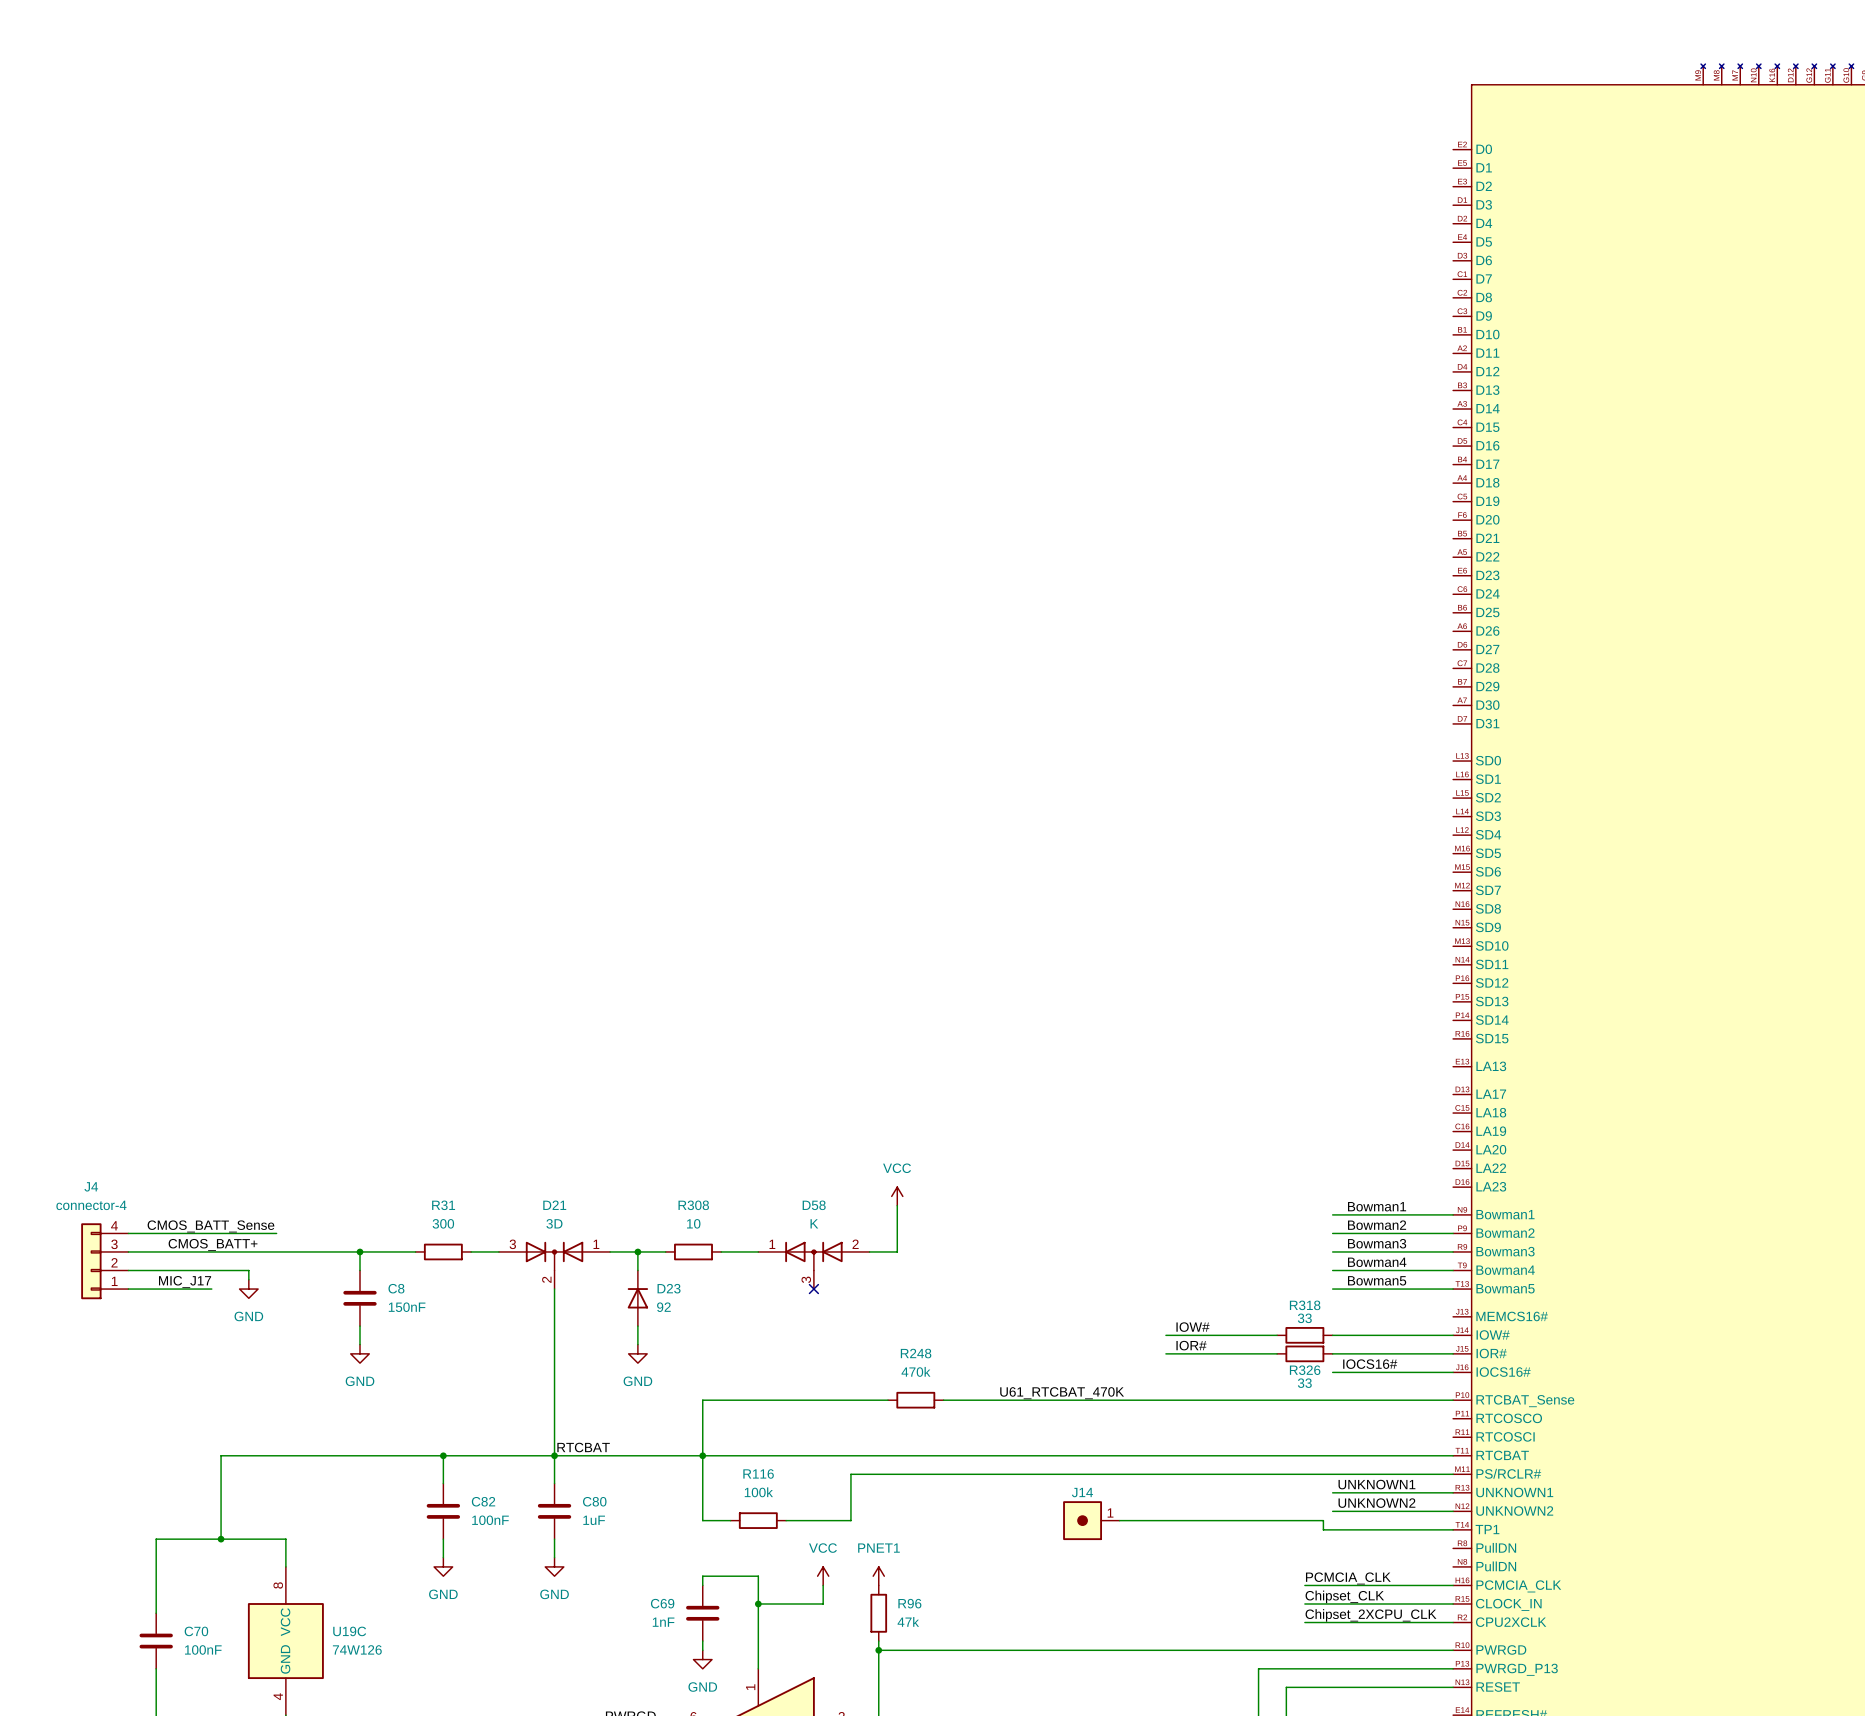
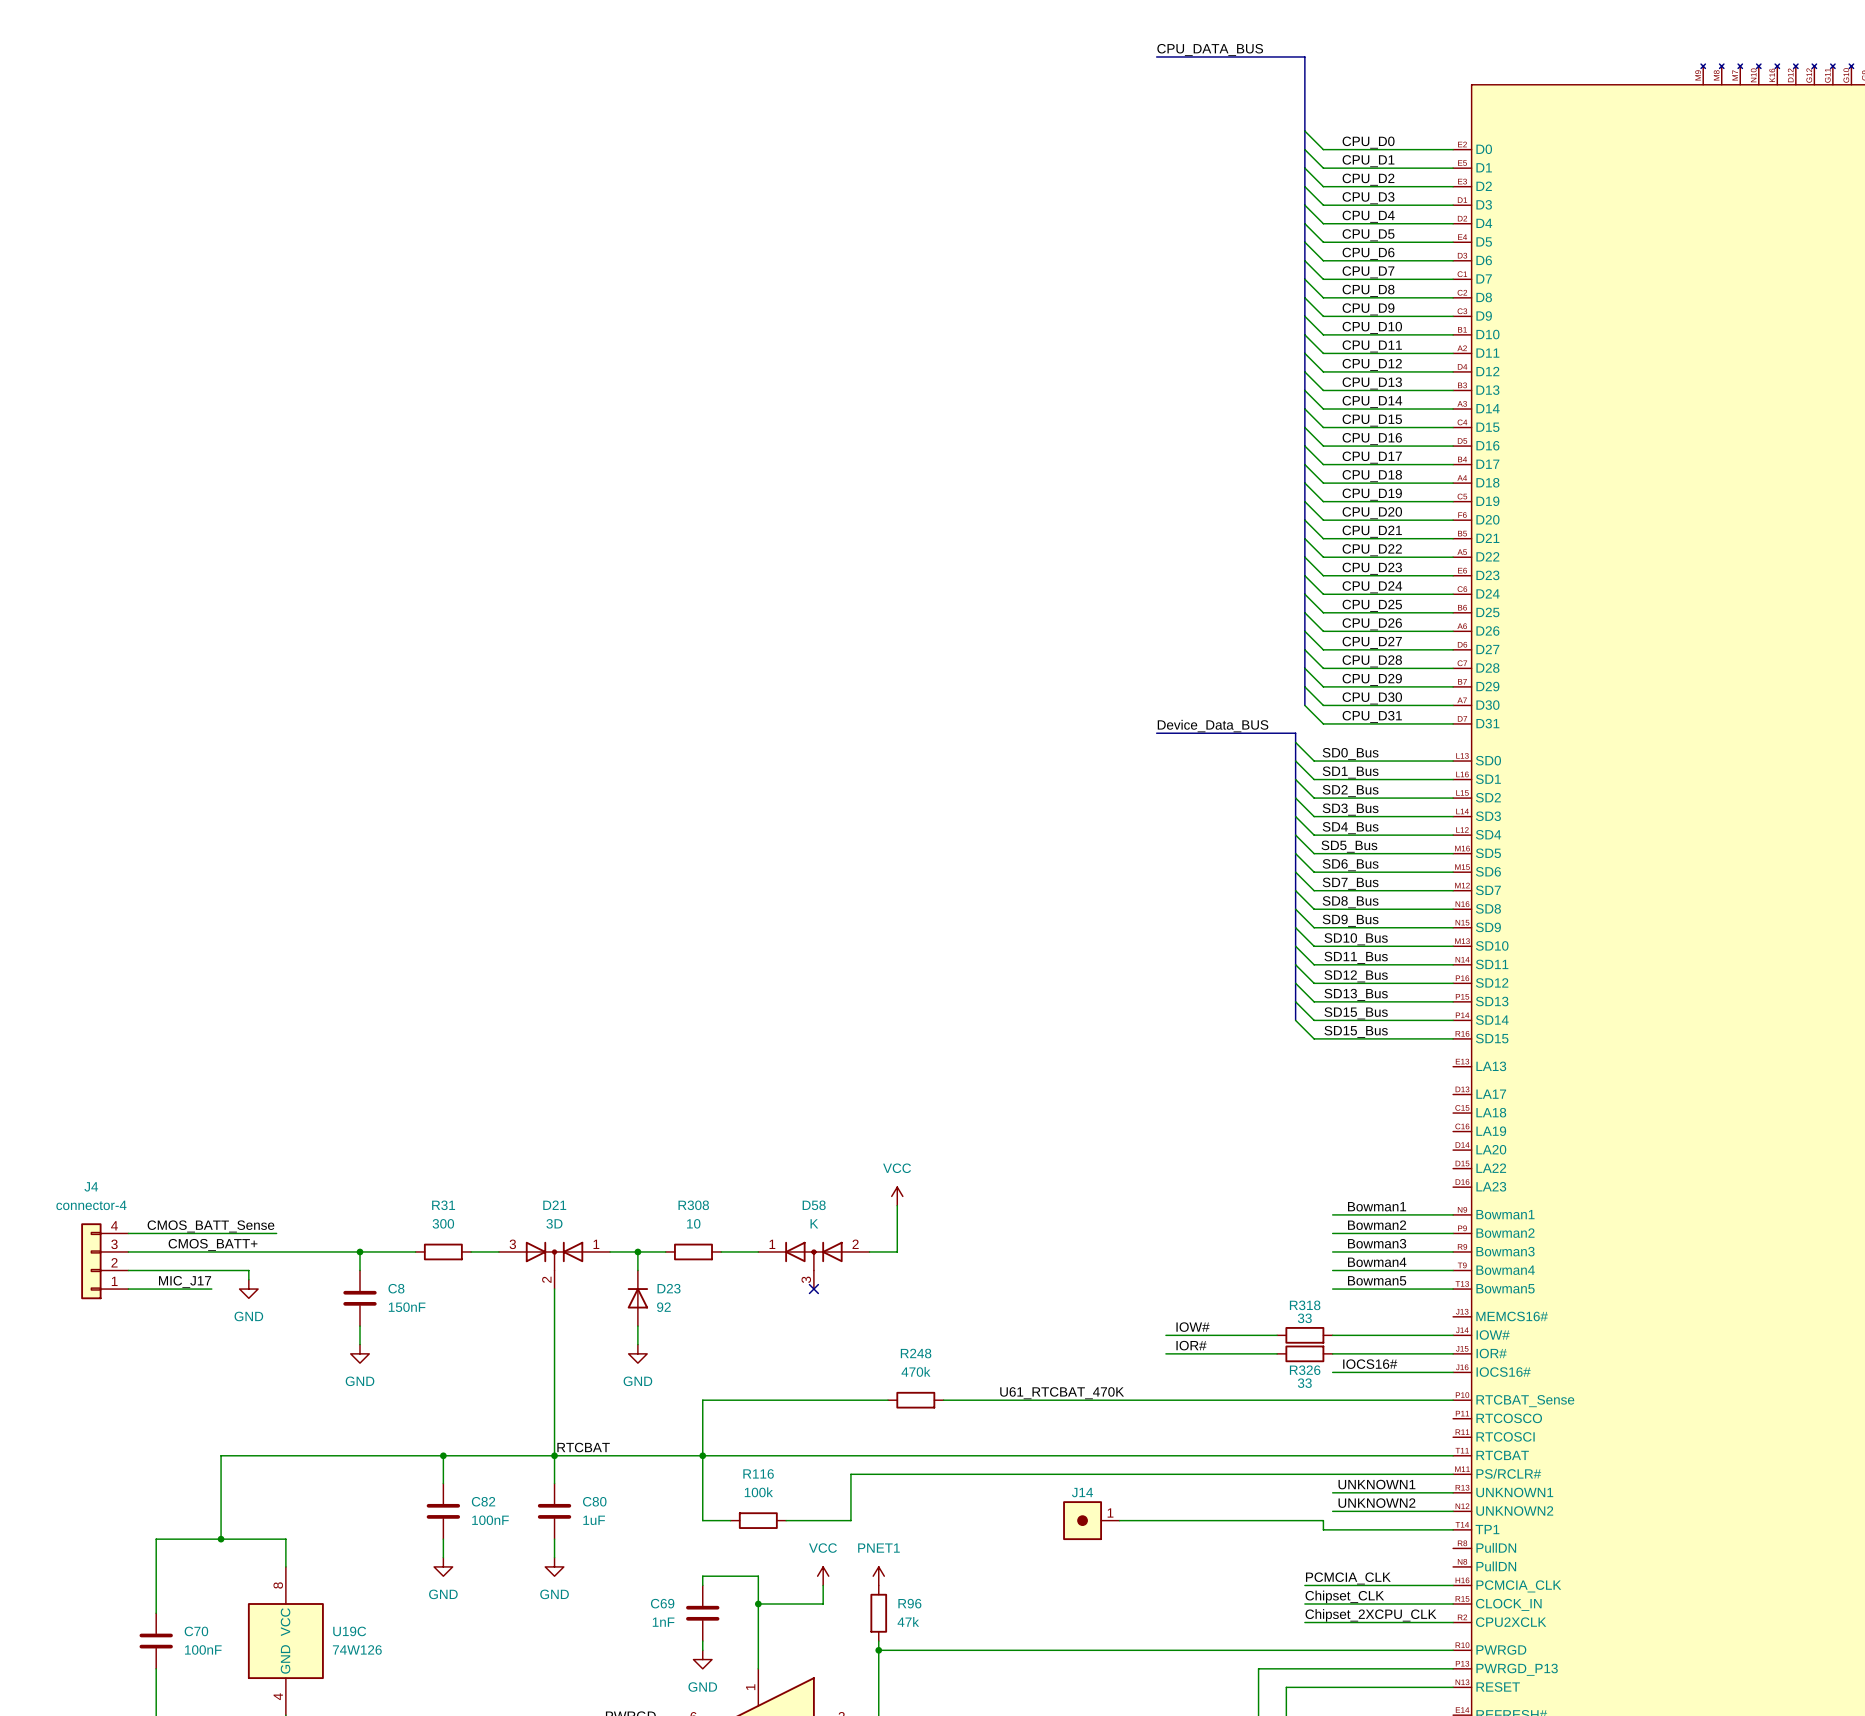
label: none -> CPU_DATA_BUS (1210, 49)
bus: none -> (1156, 56) (1304, 56) (1304, 705)
wire: none -> (1304, 131) (1323, 149) (1453, 149)
label: none -> CPU_D0 (1368, 142)
wire: none -> (1304, 149) (1323, 168) (1453, 168)
label: none -> CPU_D1 (1368, 161)
wire: none -> (1304, 168) (1323, 186) (1453, 186)
label: none -> CPU_D2 (1368, 179)
wire: none -> (1304, 186) (1323, 205) (1453, 205)
label: none -> CPU_D3 (1368, 198)
wire: none -> (1304, 205) (1323, 223) (1453, 223)
label: none -> CPU_D4 (1368, 216)
wire: none -> (1304, 223) (1323, 242) (1453, 242)
label: none -> CPU_D5 (1368, 235)
wire: none -> (1304, 242) (1323, 260) (1453, 260)
label: none -> CPU_D6 (1368, 253)
wire: none -> (1304, 260) (1323, 279) (1453, 279)
label: none -> CPU_D7 (1368, 272)
wire: none -> (1304, 279) (1323, 297) (1453, 297)
label: none -> CPU_D8 (1368, 290)
wire: none -> (1304, 297) (1323, 316) (1453, 316)
label: none -> CPU_D9 (1368, 309)
wire: none -> (1304, 316) (1323, 334) (1453, 334)
label: none -> CPU_D10 (1372, 327)
wire: none -> (1304, 334) (1323, 353) (1453, 353)
label: none -> CPU_D11 (1372, 346)
wire: none -> (1304, 353) (1323, 371) (1453, 371)
label: none -> CPU_D12 (1372, 364)
wire: none -> (1304, 371) (1323, 390) (1453, 390)
label: none -> CPU_D13 (1372, 383)
wire: none -> (1304, 390) (1323, 409) (1453, 409)
label: none -> CPU_D14 (1372, 402)
wire: none -> (1304, 409) (1323, 427) (1453, 427)
label: none -> CPU_D15 (1372, 420)
wire: none -> (1304, 427) (1323, 446) (1453, 446)
label: none -> CPU_D16 (1372, 439)
wire: none -> (1304, 446) (1323, 464) (1453, 464)
label: none -> CPU_D17 (1372, 457)
wire: none -> (1304, 464) (1323, 483) (1453, 483)
label: none -> CPU_D18 (1372, 476)
wire: none -> (1304, 483) (1323, 501) (1453, 501)
label: none -> CPU_D19 (1372, 494)
wire: none -> (1304, 501) (1323, 520) (1453, 520)
label: none -> CPU_D20 (1372, 513)
wire: none -> (1304, 520) (1323, 538) (1453, 538)
label: none -> CPU_D21 (1372, 531)
wire: none -> (1304, 538) (1323, 557) (1453, 557)
label: none -> CPU_D22 (1372, 550)
wire: none -> (1304, 557) (1323, 575) (1453, 575)
label: none -> CPU_D23 (1372, 568)
wire: none -> (1304, 575) (1323, 594) (1453, 594)
label: none -> CPU_D24 (1372, 587)
wire: none -> (1304, 594) (1323, 612) (1453, 612)
label: none -> CPU_D25 (1372, 605)
wire: none -> (1304, 612) (1323, 631) (1453, 631)
label: none -> CPU_D26 (1372, 624)
wire: none -> (1304, 631) (1323, 649) (1453, 649)
label: none -> CPU_D27 (1372, 642)
wire: none -> (1304, 649) (1323, 668) (1453, 668)
label: none -> CPU_D28 (1372, 661)
wire: none -> (1304, 668) (1323, 686) (1453, 686)
label: none -> CPU_D29 (1372, 679)
wire: none -> (1304, 686) (1323, 705) (1453, 705)
label: none -> CPU_D30 (1372, 698)
wire: none -> (1304, 705) (1323, 723) (1453, 723)
label: none -> CPU_D31 (1372, 716)
label: none -> Device_Data_BUS (1213, 726)
bus: none -> (1156, 733) (1295, 733) (1295, 1020)
wire: none -> (1295, 742) (1314, 761) (1453, 761)
label: none -> SD0_Bus (1350, 754)
wire: none -> (1295, 761) (1314, 779) (1453, 779)
label: none -> SD1_Bus (1350, 772)
wire: none -> (1295, 779) (1314, 798) (1453, 798)
label: none -> SD2_Bus (1350, 791)
wire: none -> (1295, 798) (1314, 816) (1453, 816)
label: none -> SD3_Bus (1350, 809)
wire: none -> (1295, 816) (1314, 835) (1453, 835)
label: none -> SD4_Bus (1350, 828)
wire: none -> (1295, 835) (1314, 853) (1453, 853)
label: none -> SD5_Bus (1349, 846)
wire: none -> (1295, 853) (1314, 872) (1453, 872)
label: none -> SD6_Bus (1350, 865)
wire: none -> (1295, 872) (1314, 890) (1453, 890)
label: none -> SD7_Bus (1350, 883)
wire: none -> (1295, 890) (1314, 909) (1453, 909)
label: none -> SD8_Bus (1350, 902)
wire: none -> (1295, 909) (1314, 927) (1453, 927)
label: none -> SD9_Bus (1350, 920)
wire: none -> (1295, 927) (1314, 946) (1453, 946)
label: none -> SD10_Bus (1356, 939)
wire: none -> (1295, 946) (1314, 964) (1453, 964)
label: none -> SD11_Bus (1356, 957)
wire: none -> (1295, 964) (1314, 983) (1453, 983)
label: none -> SD12_Bus (1356, 976)
wire: none -> (1295, 983) (1314, 1001) (1453, 1001)
label: none -> SD13_Bus (1356, 994)
wire: none -> (1295, 1001) (1314, 1020) (1453, 1020)
label: none -> SD15_Bus (1356, 1013)
wire: none -> (1295, 1020) (1314, 1038) (1453, 1038)
label: none -> SD15_Bus (1356, 1031)

